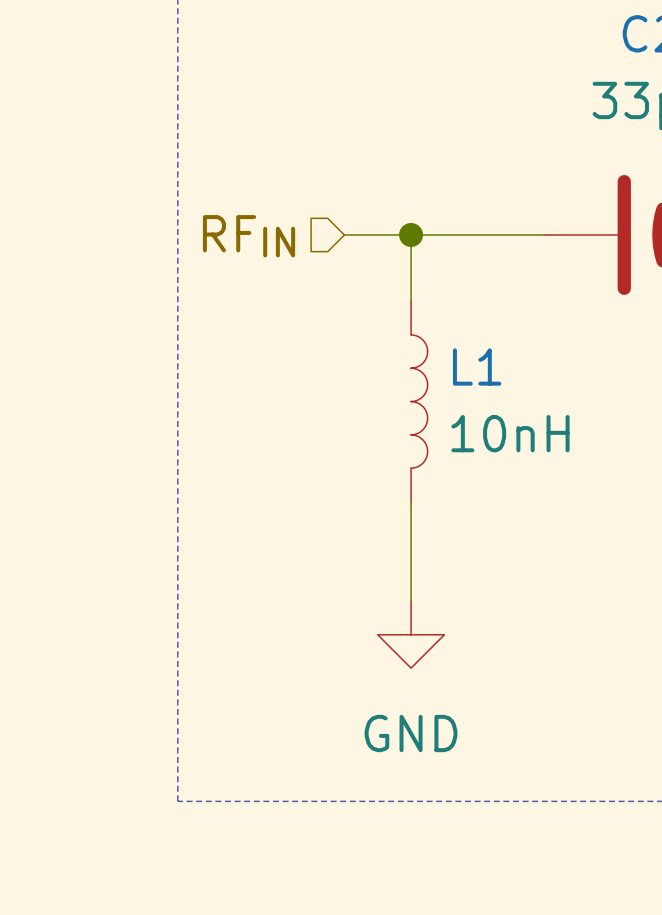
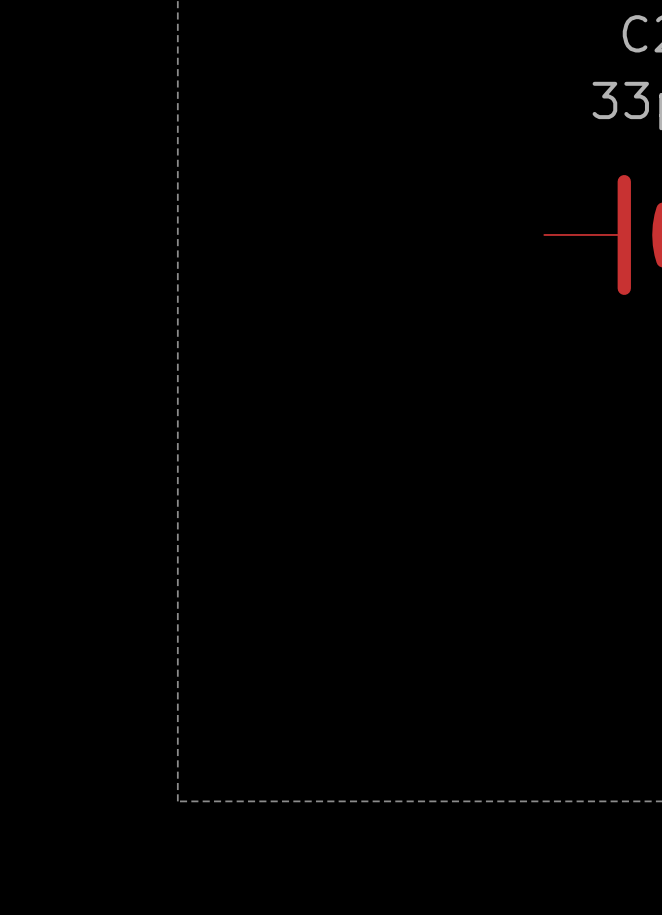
wire: (344, 234) (544, 234) -> none
wire: (411, 234) (411, 301) -> none
junction: (411, 234) -> none
hierarchical label: RFIN (249, 236) -> none
L1: 10nH (419, 401) -> none
wire: (411, 501) (411, 601) -> none
power symbol: GND (411, 634) -> none

